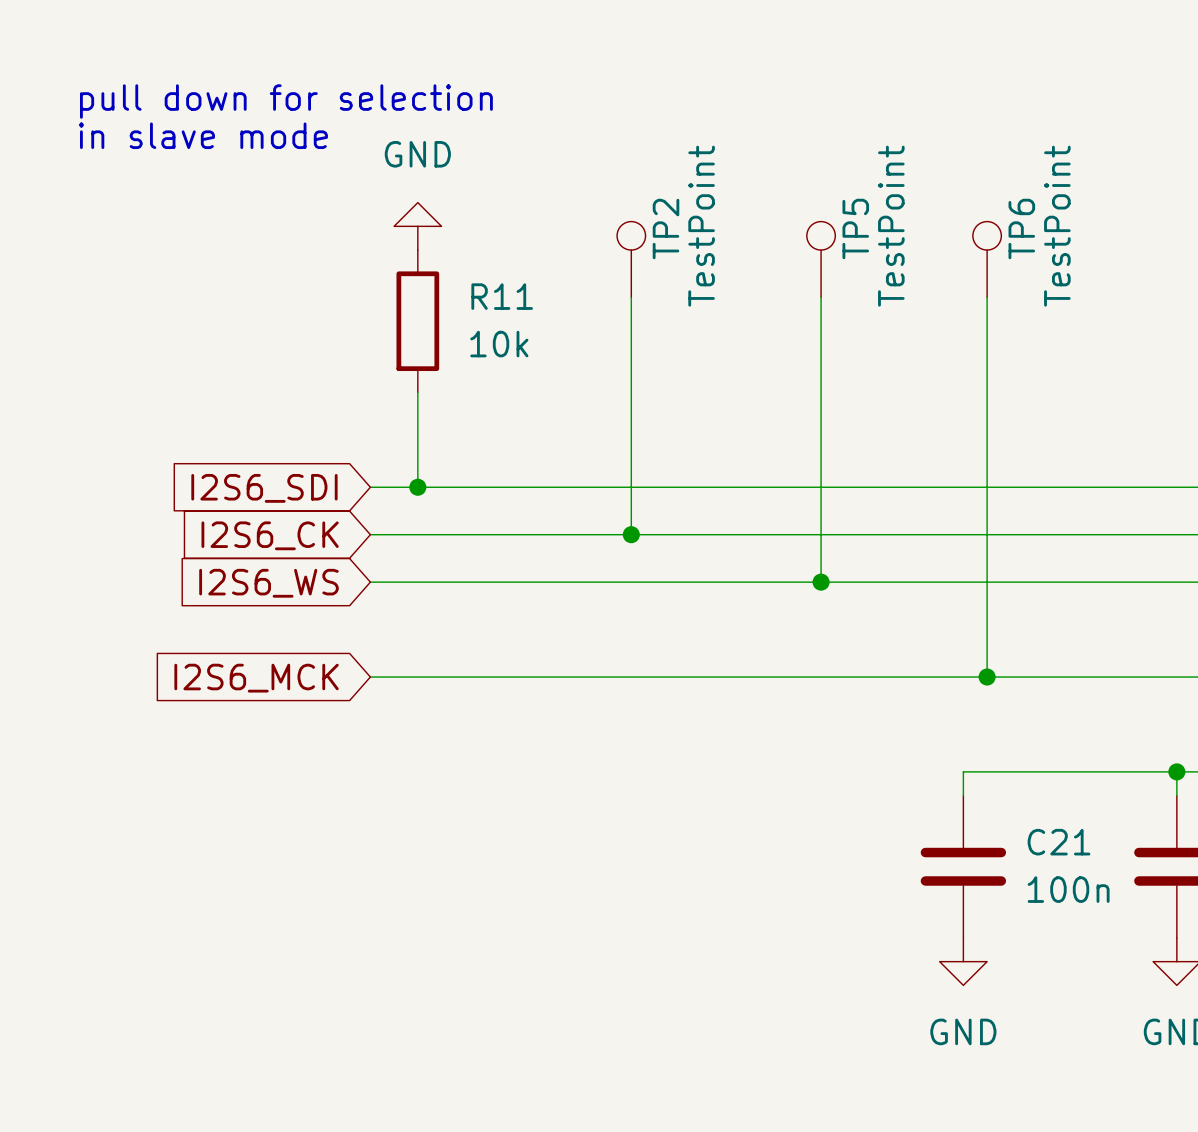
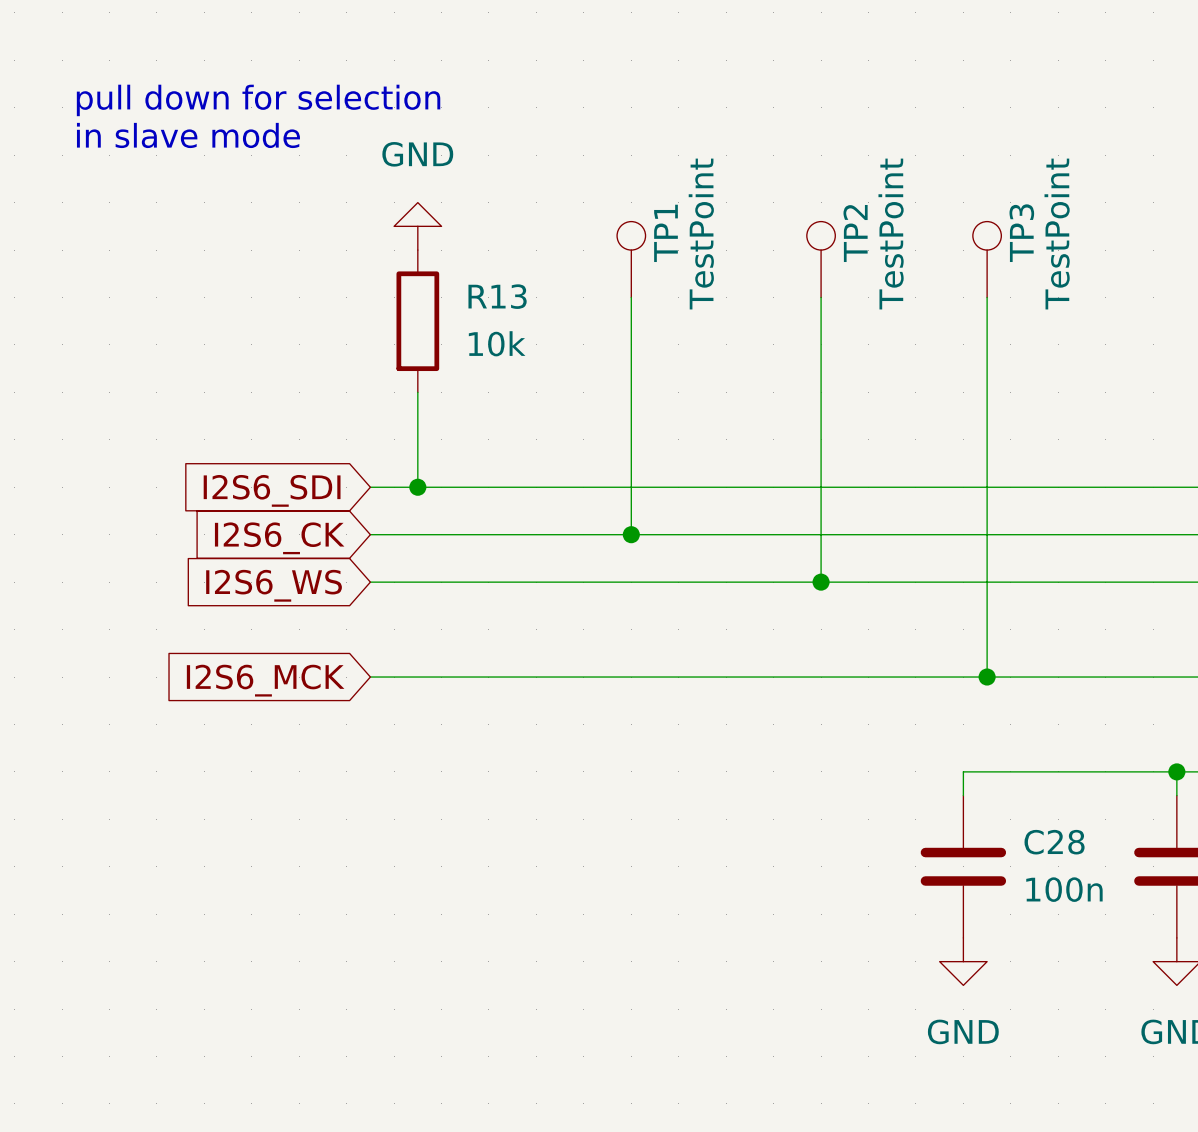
TP2 name: TP2 (666, 228) -> TP1 (666, 233)
TP5 name: TP5 (855, 228) -> TP2 (855, 233)
TP6 name: TP6 (1021, 228) -> TP3 (1021, 233)
R11 name: R11 (502, 296) -> R13 (497, 296)
C21 name: C21 (1059, 842) -> C28 (1054, 842)

